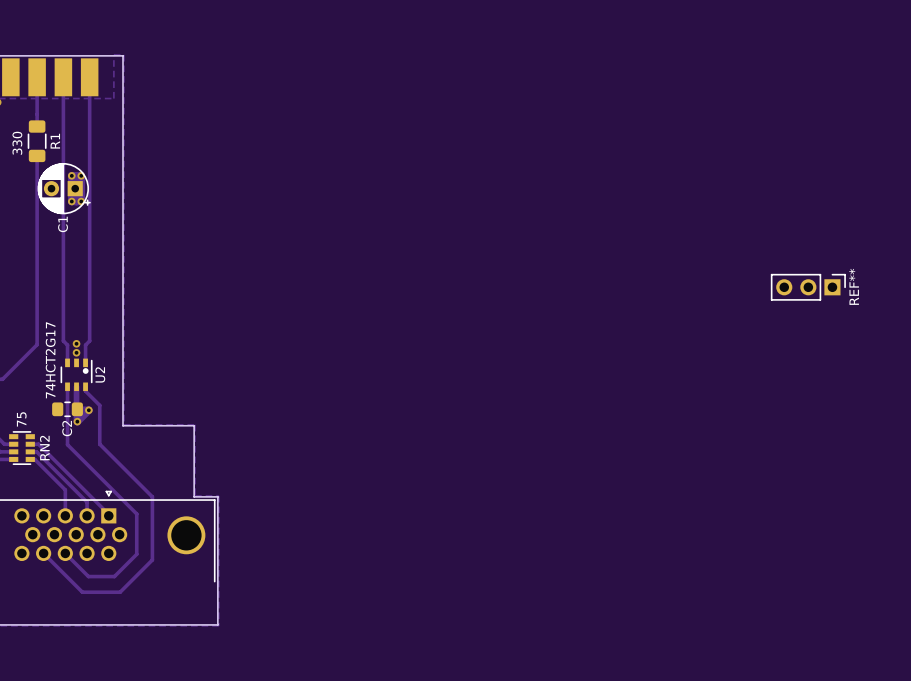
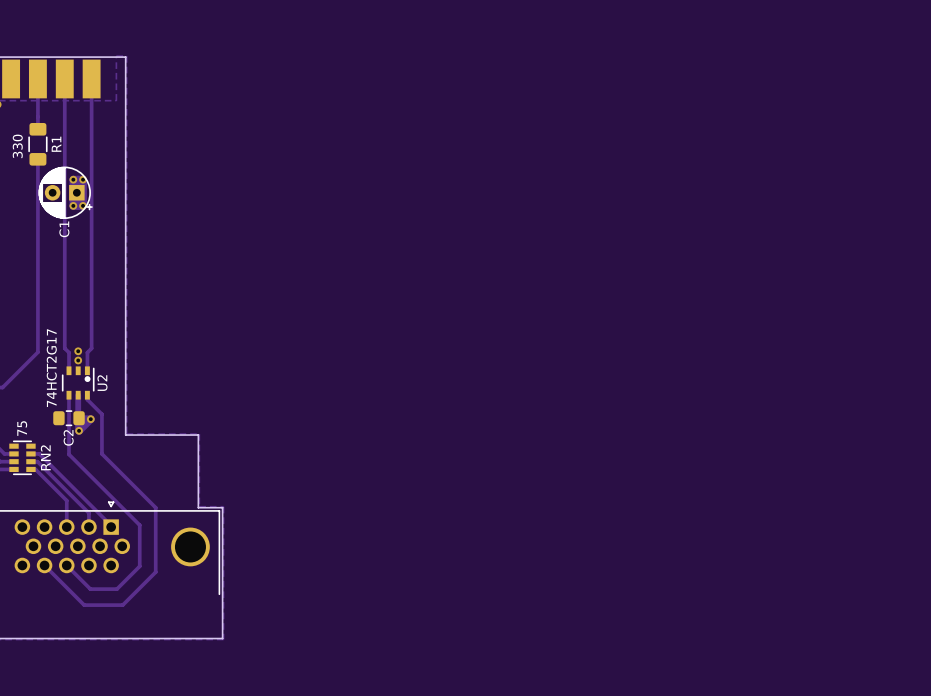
REF**: (808, 287) -> none

